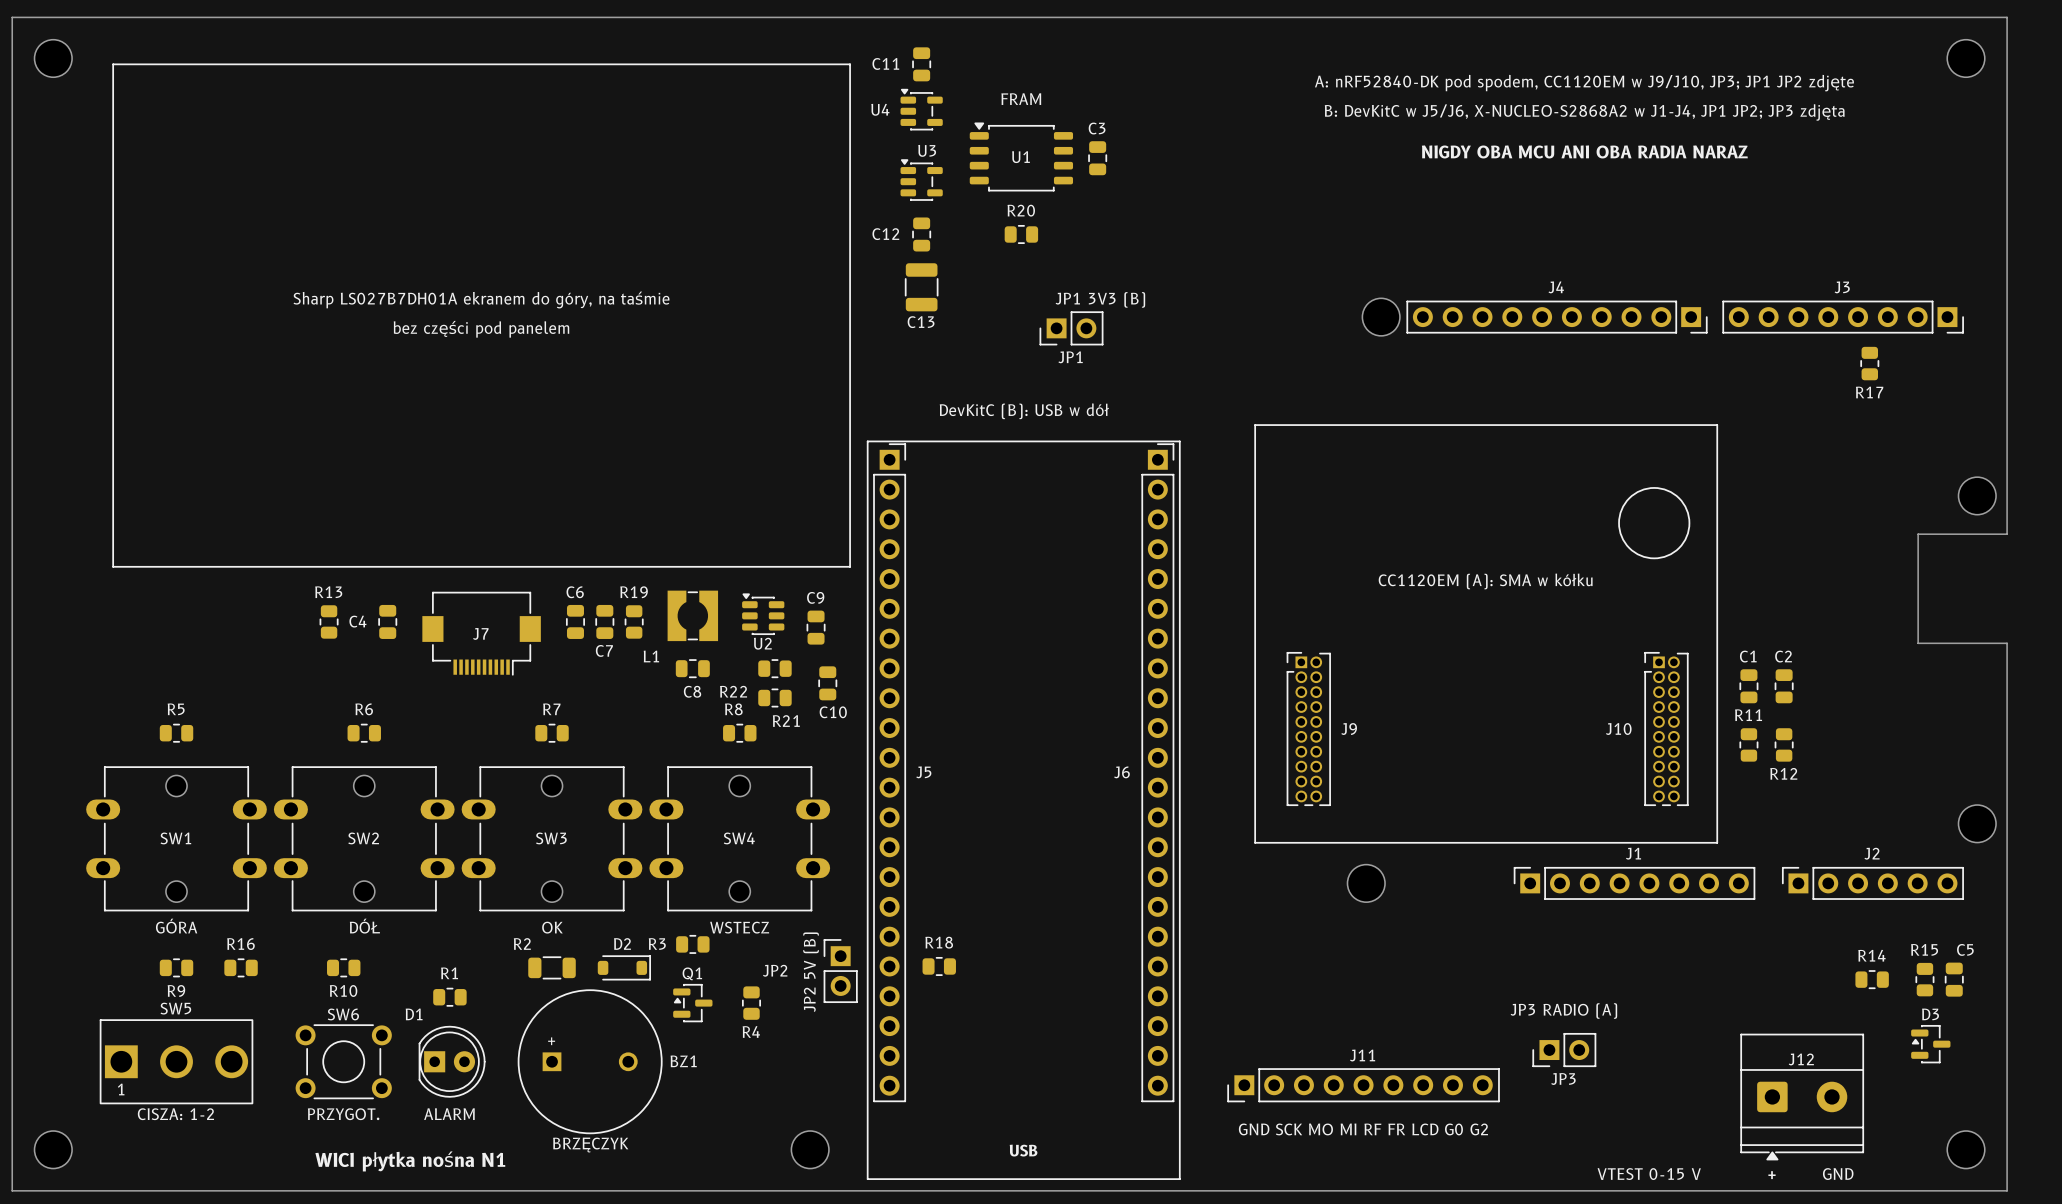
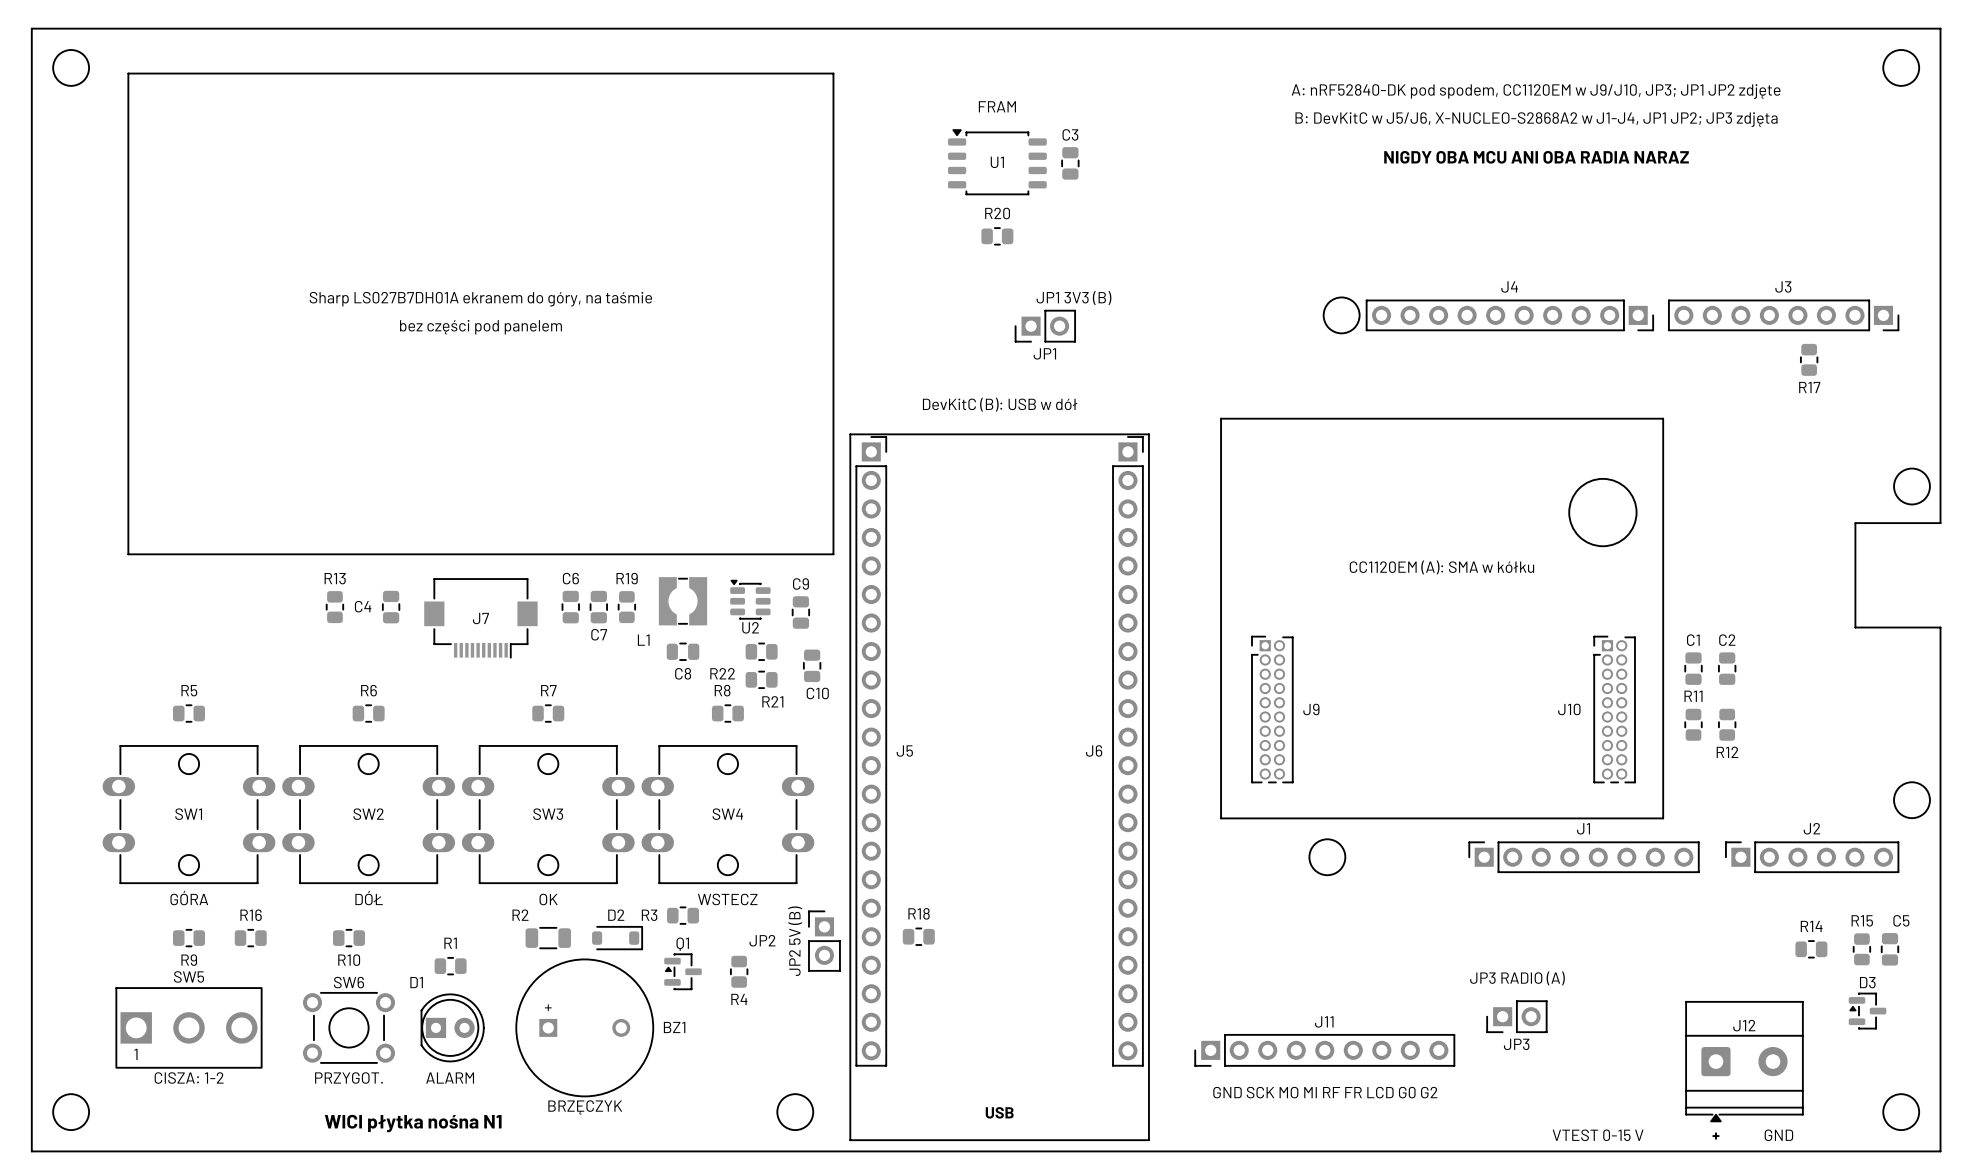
C11: (921, 64) -> none
U4: (921, 109) -> none
U3: (921, 180) -> none
C12: (921, 234) -> none
C13: (921, 287) -> none

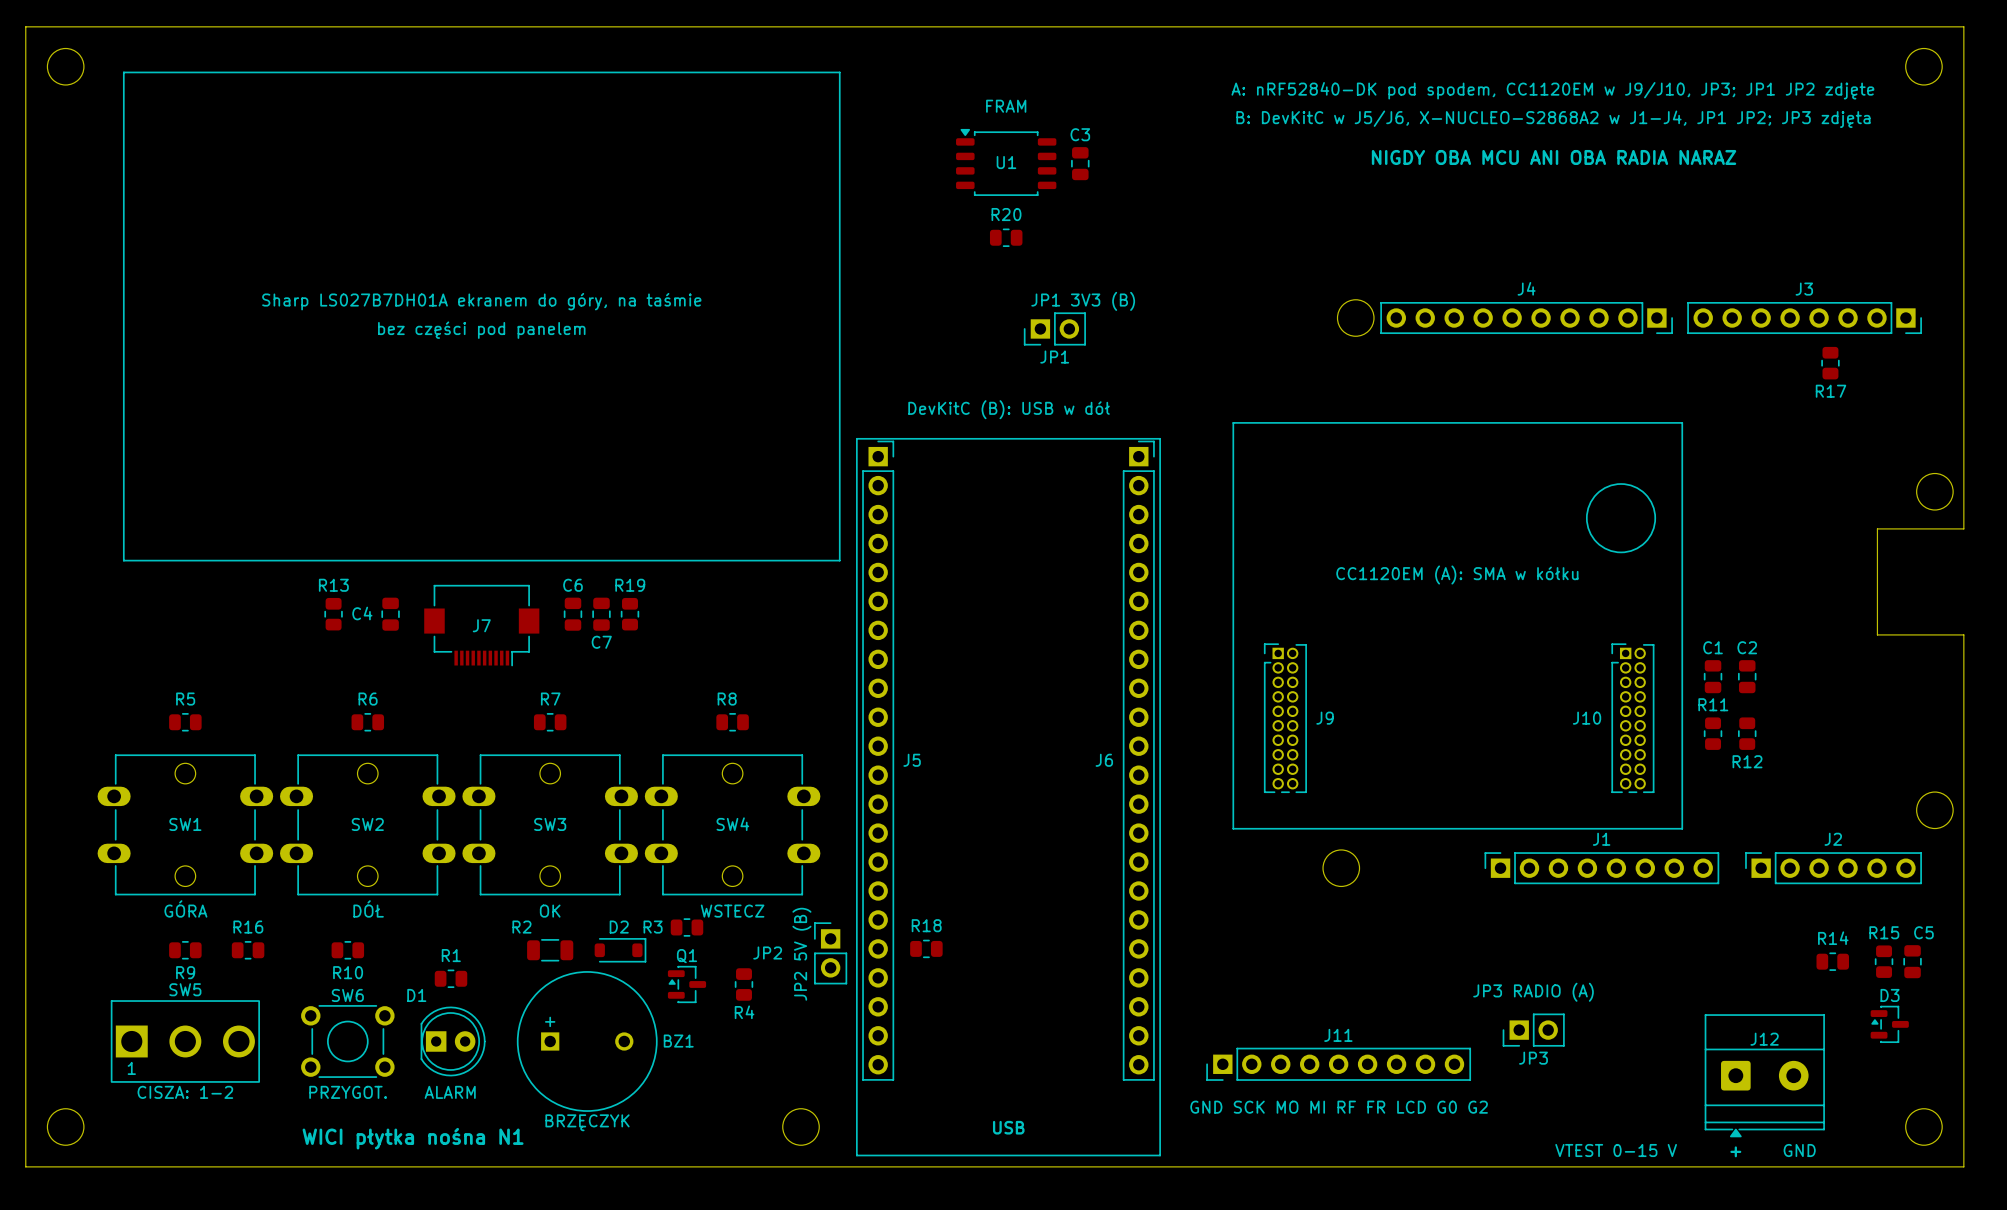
U2: (750, 599) -> none
L1: (683, 601) -> none
C9: (800, 612) -> none
C8: (683, 651) -> none
R21: (761, 651) -> none
C10: (812, 665) -> none
R22: (761, 679) -> none

